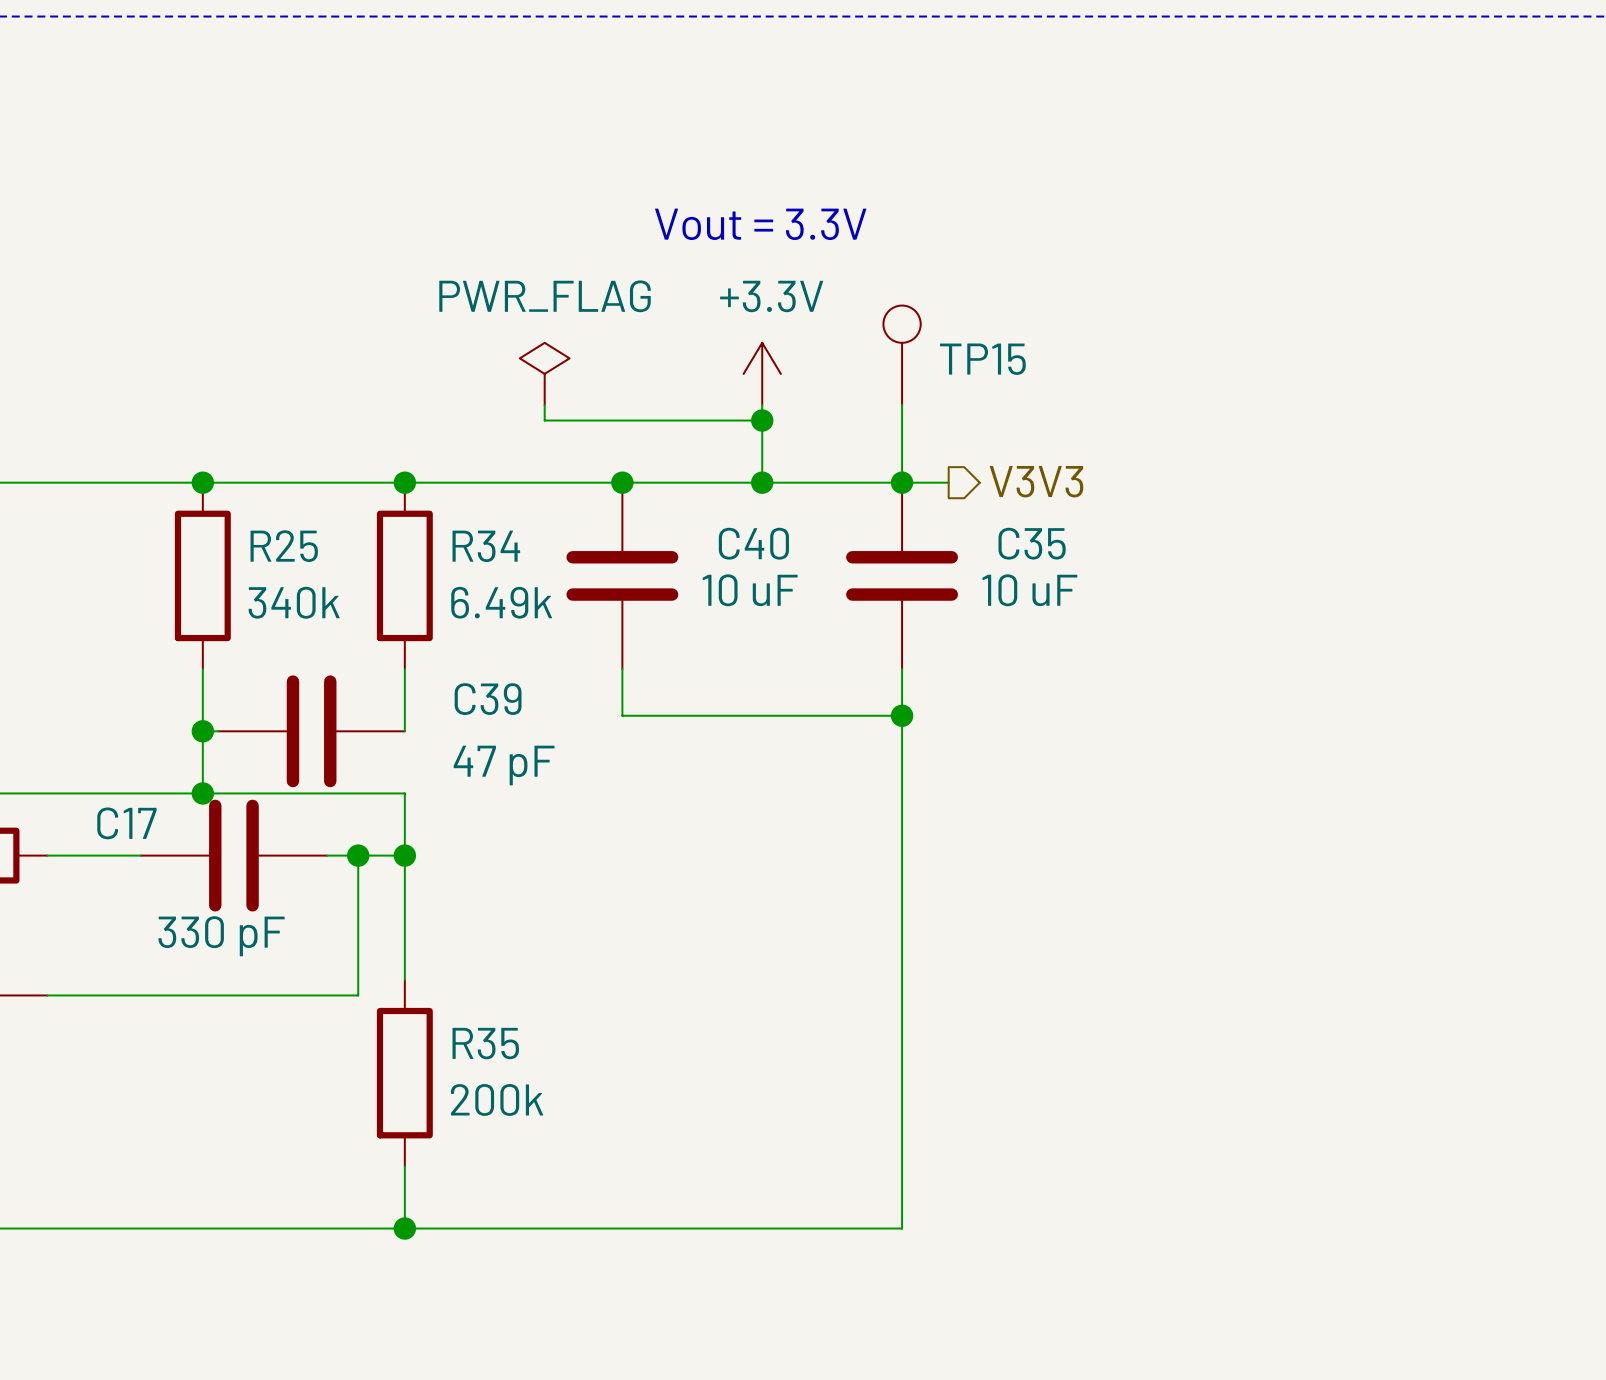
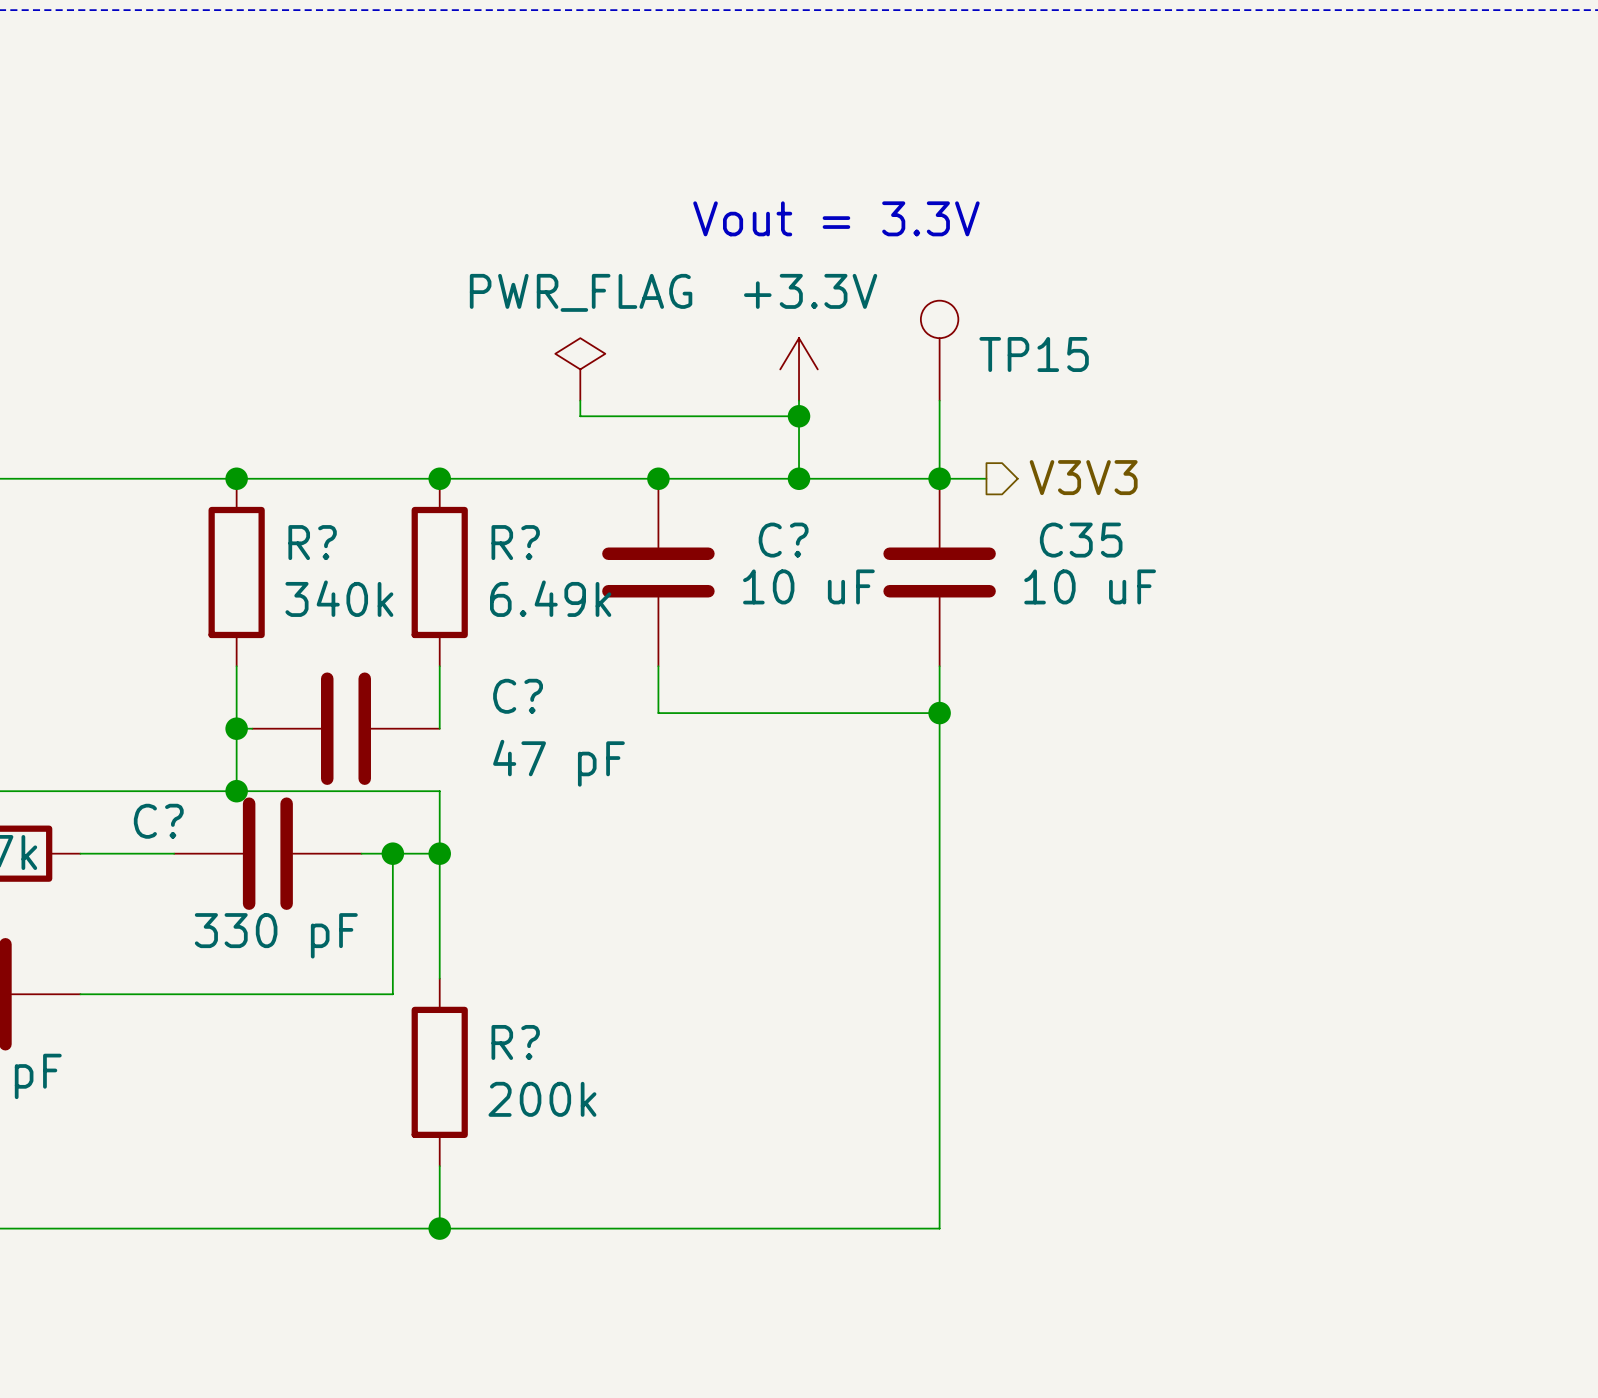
C40 name: C40 (753, 543) -> C? (783, 540)
R25 name: R25 (284, 546) -> R? (312, 542)
R34 name: R34 (486, 546) -> R? (515, 542)
C39 name: C39 (488, 699) -> C? (518, 696)
C17 name: C17 (126, 823) -> C? (158, 821)
R35 name: R35 (485, 1043) -> R? (515, 1042)

